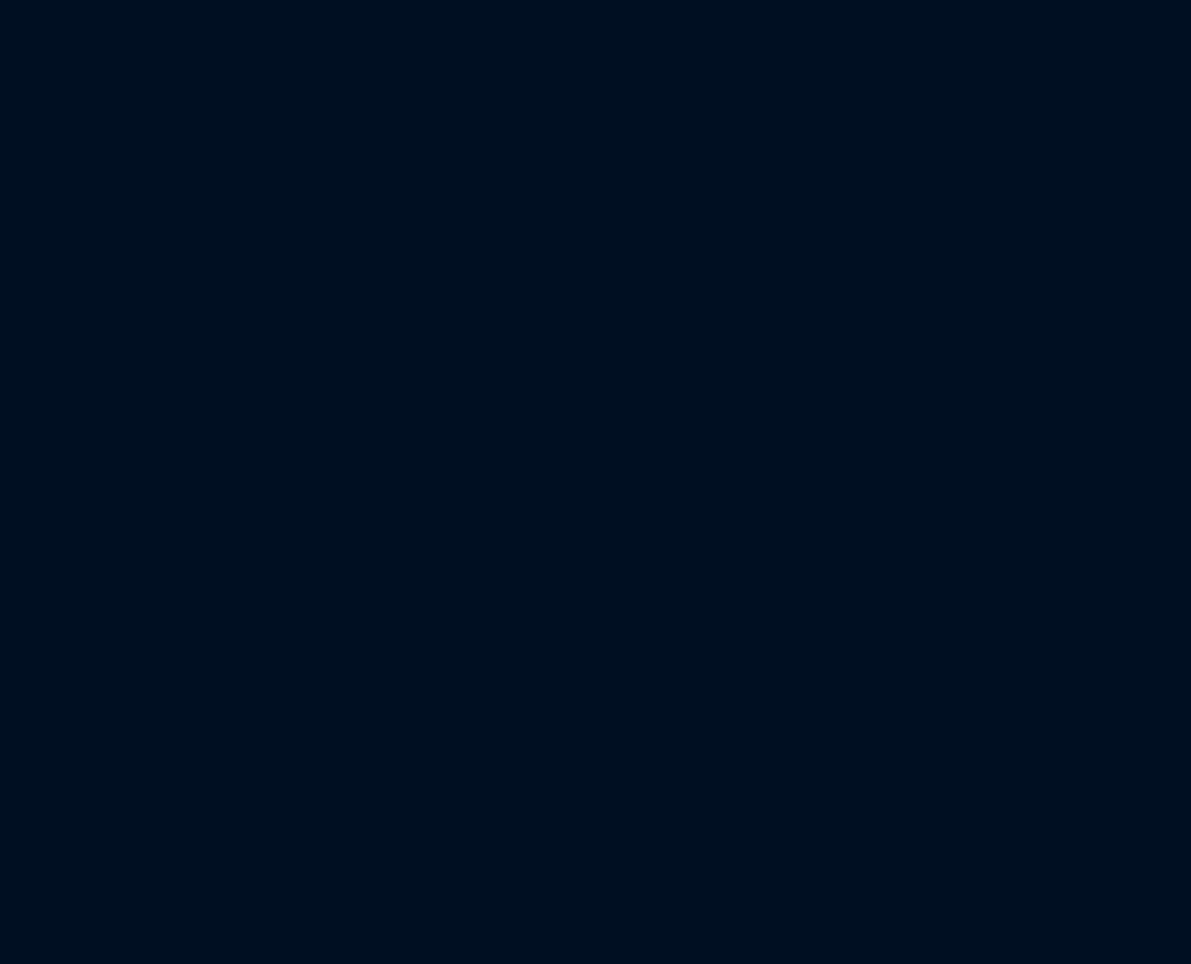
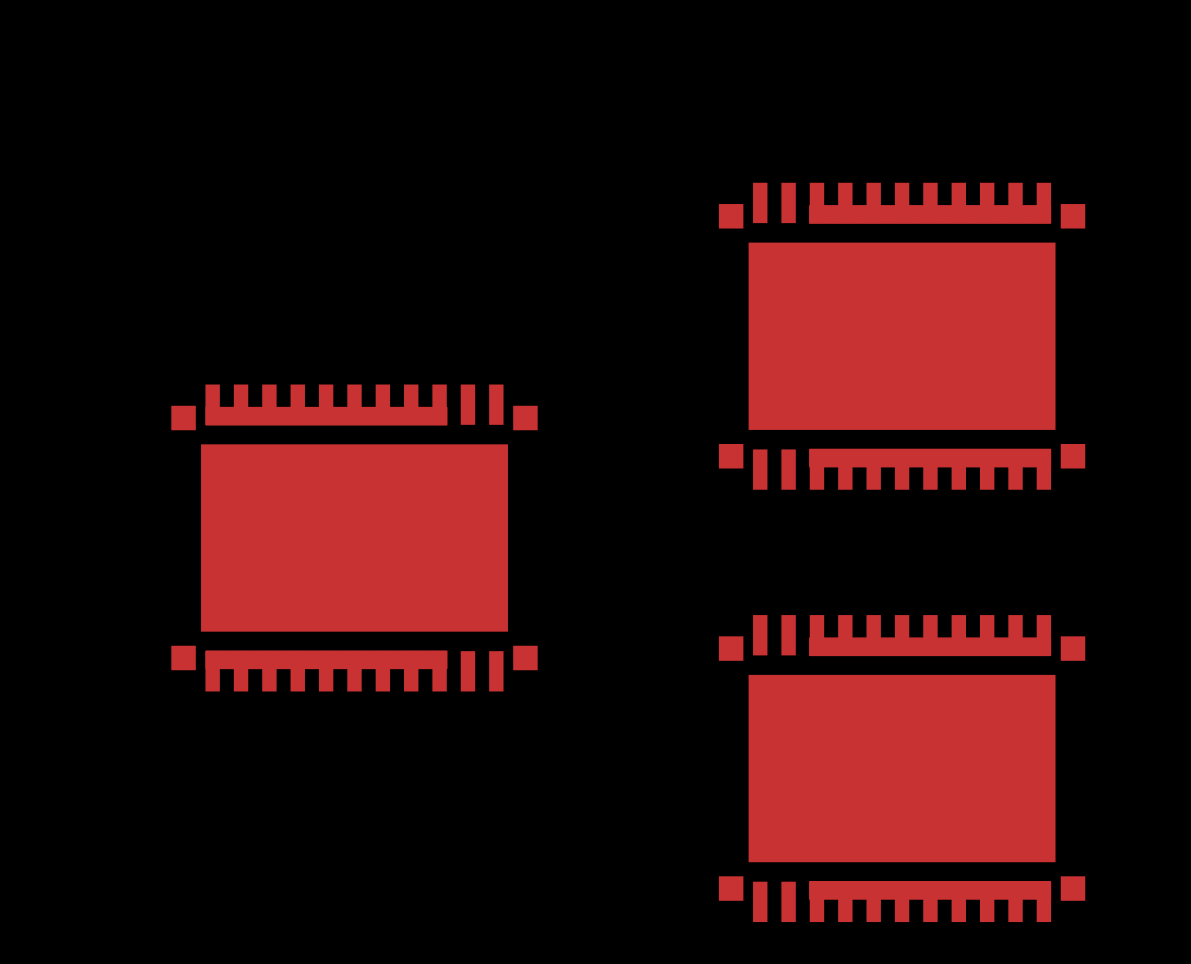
part: none -> (902, 336)
part: none -> (354, 538)
part: none -> (902, 768)

